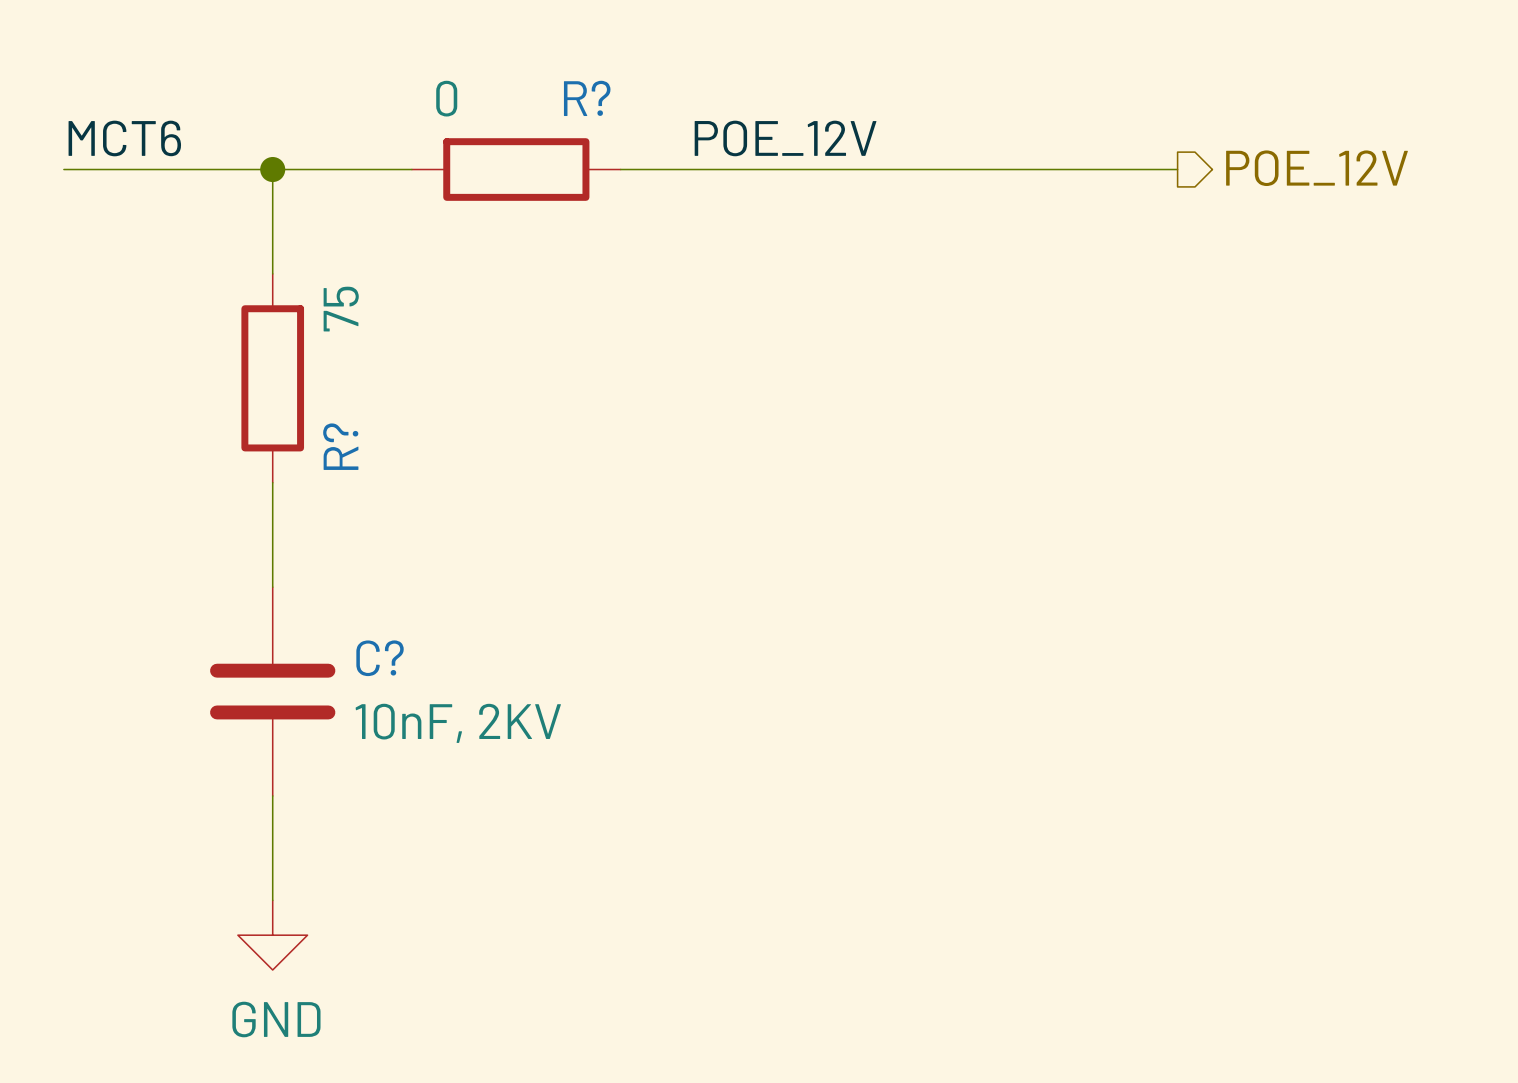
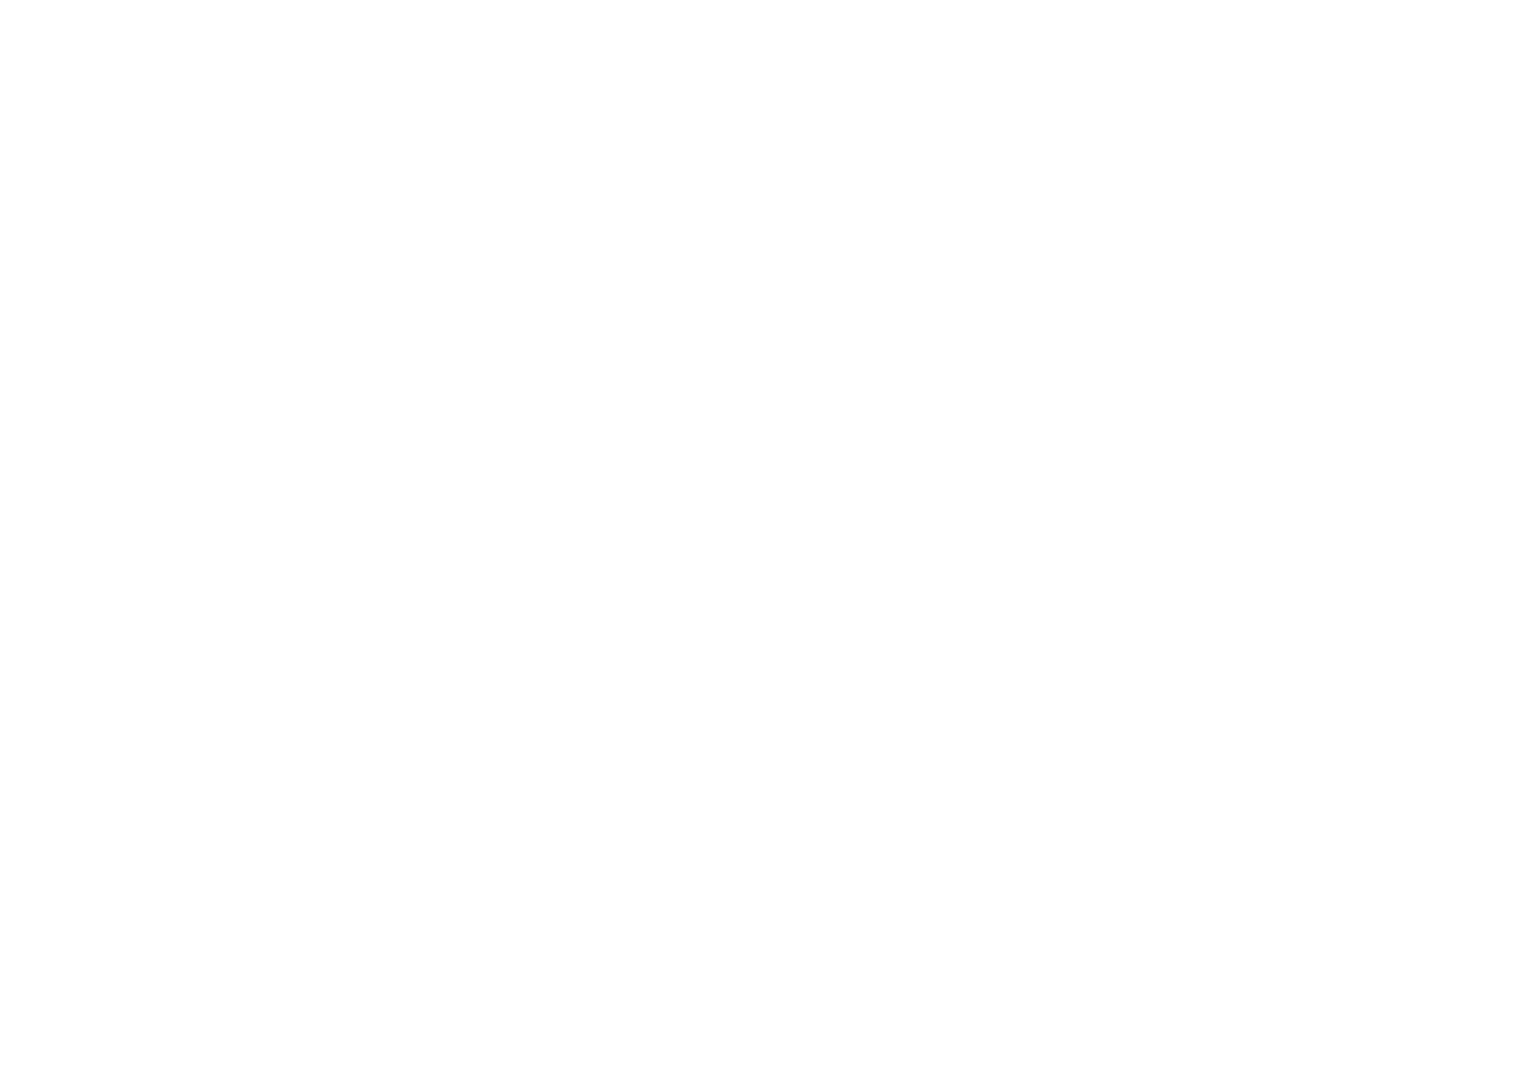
label: MCT6 (124, 138) -> none
label: POE_12V (785, 138) -> none
hierarchical label: POE_12V (1317, 168) -> none
wire: (63, 169) (411, 169) -> none
wire: (272, 169) (272, 273) -> none
junction: (272, 169) -> none
R?: 0 (516, 169) -> none
wire: (620, 169) (1177, 169) -> none
R?: 75 (272, 378) -> none
wire: (272, 482) (272, 587) -> none
C?: 10nF, 2KV (272, 691) -> none
wire: (272, 795) (272, 900) -> none
power symbol: GND (272, 935) -> none

